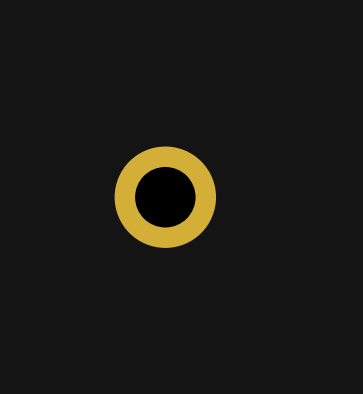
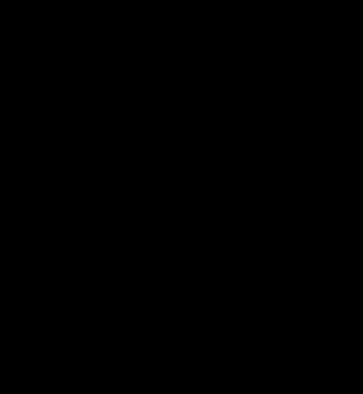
part: (165, 197) -> none

